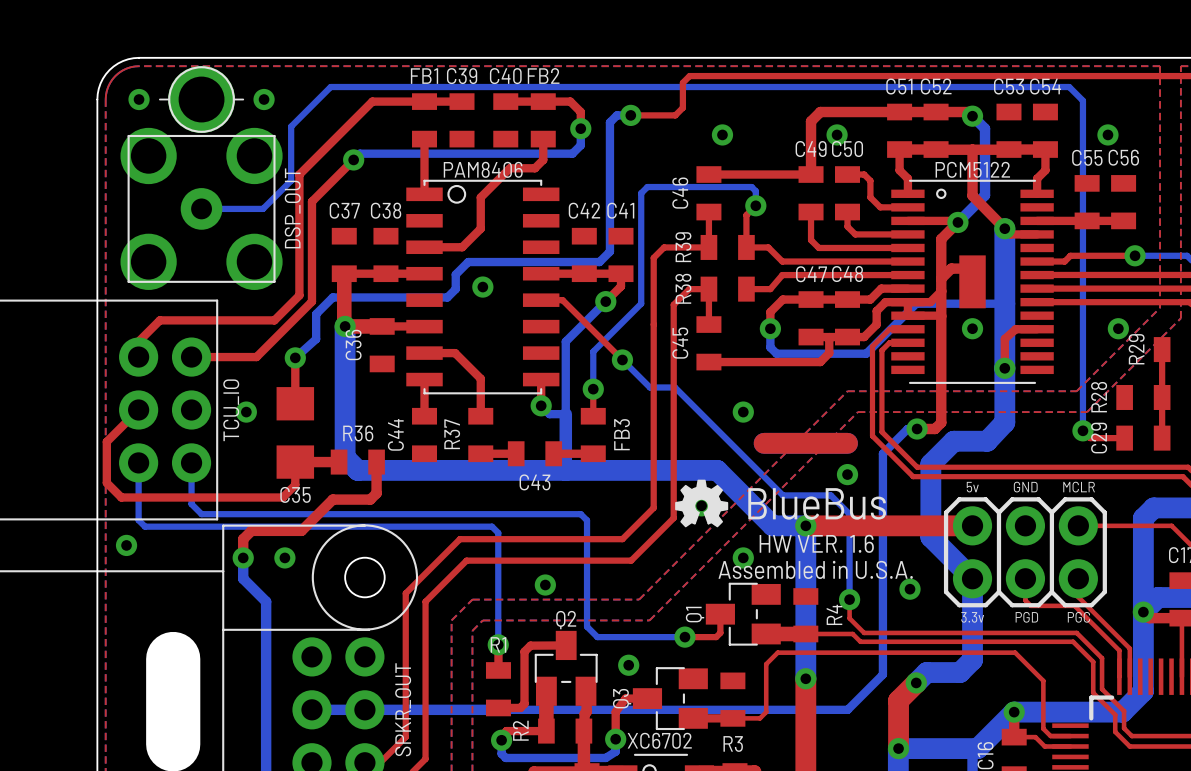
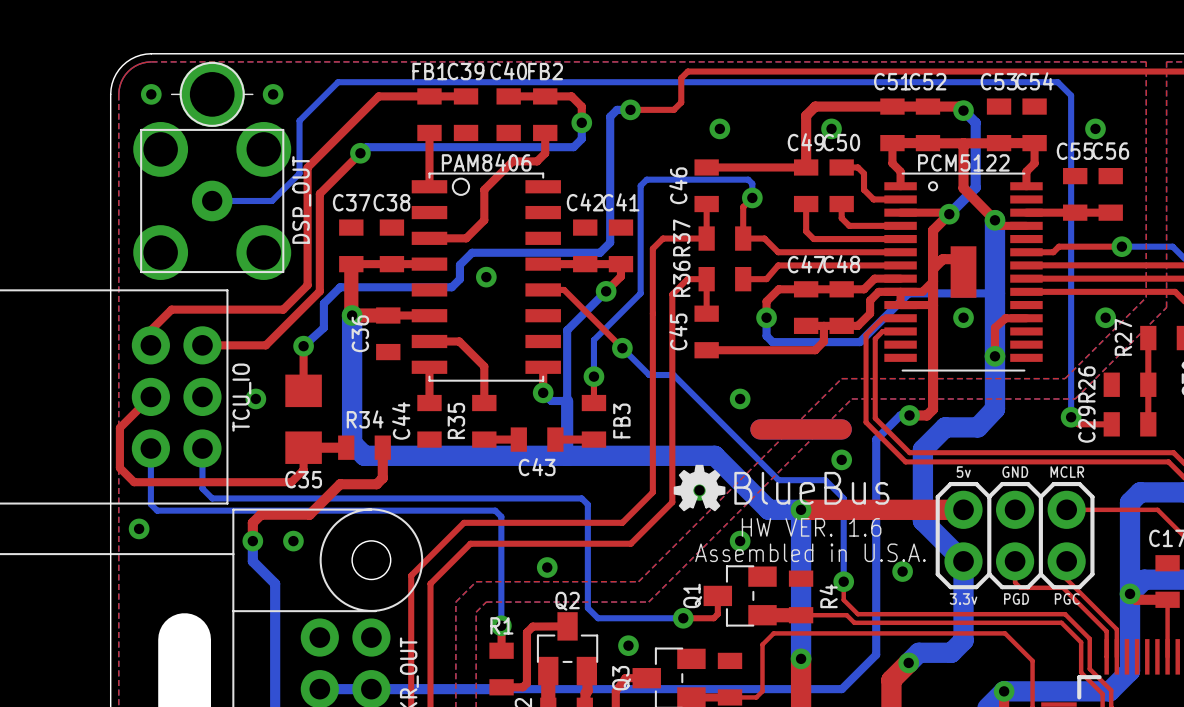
R39 name: R39 (683, 247) -> R37 (681, 237)
R38 name: R38 (683, 288) -> R36 (681, 278)
R29 name: R29 (1136, 349) -> R27 (1123, 337)
R28 name: R28 (1099, 397) -> R26 (1086, 384)
R36 name: R36 (358, 433) -> R34 (365, 419)
R37 name: R37 (452, 434) -> R35 (456, 420)

